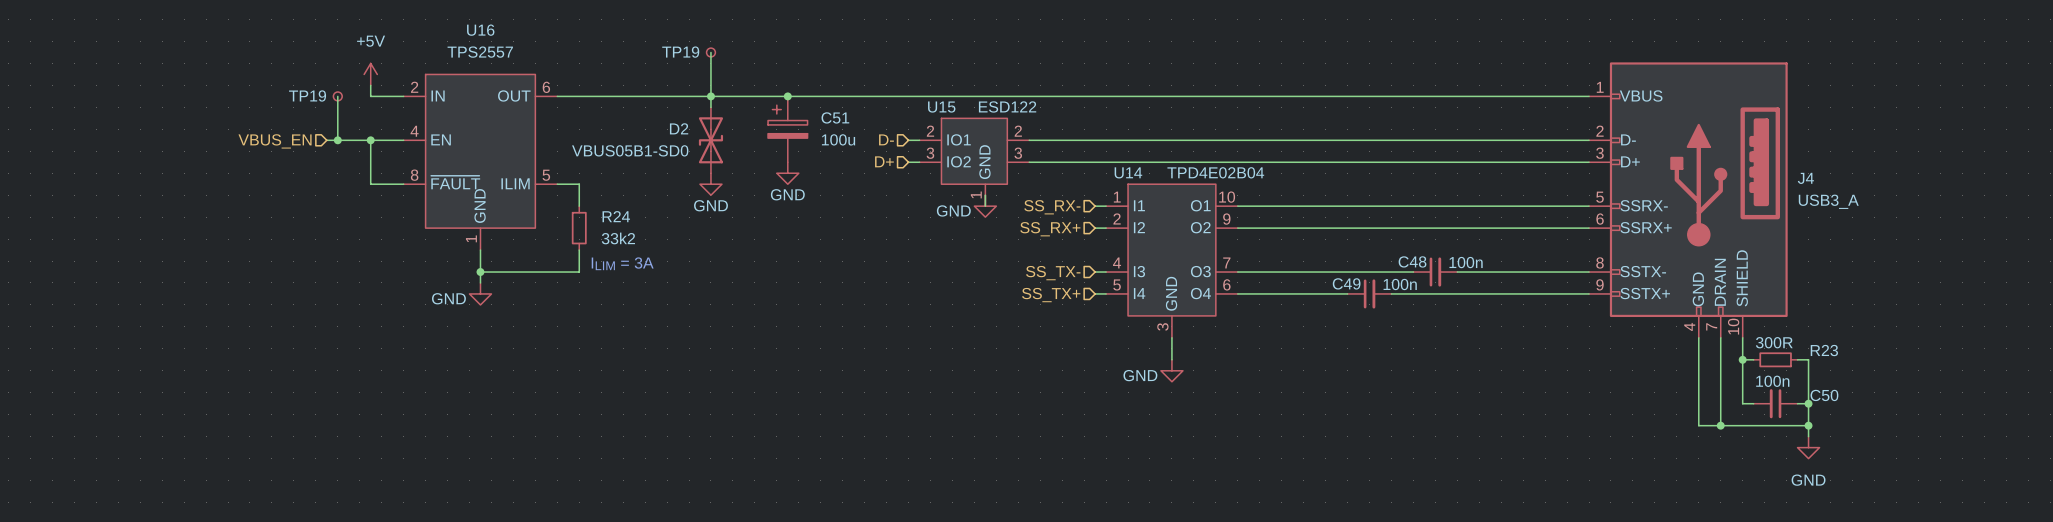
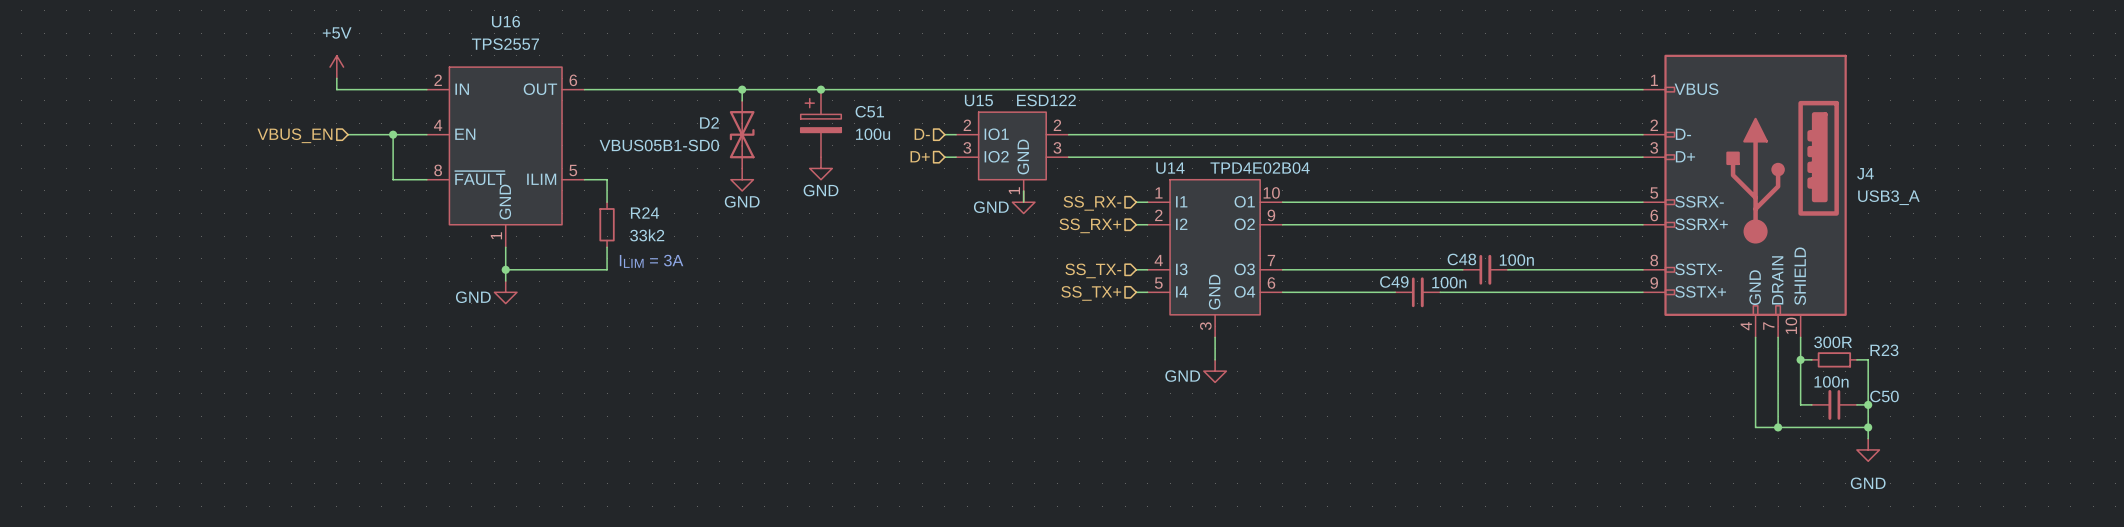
wire: (710, 52) (710, 96) -> none
TP19: (710, 52) -> none
power symbol position: +5V (370, 74) -> +5V (336, 67)
wire: (370, 85) (370, 96) -> (336, 78) (336, 89) (393, 89)
wire: (337, 96) (337, 140) -> none
TP19: (337, 96) -> none
junction: (337, 140) -> none

